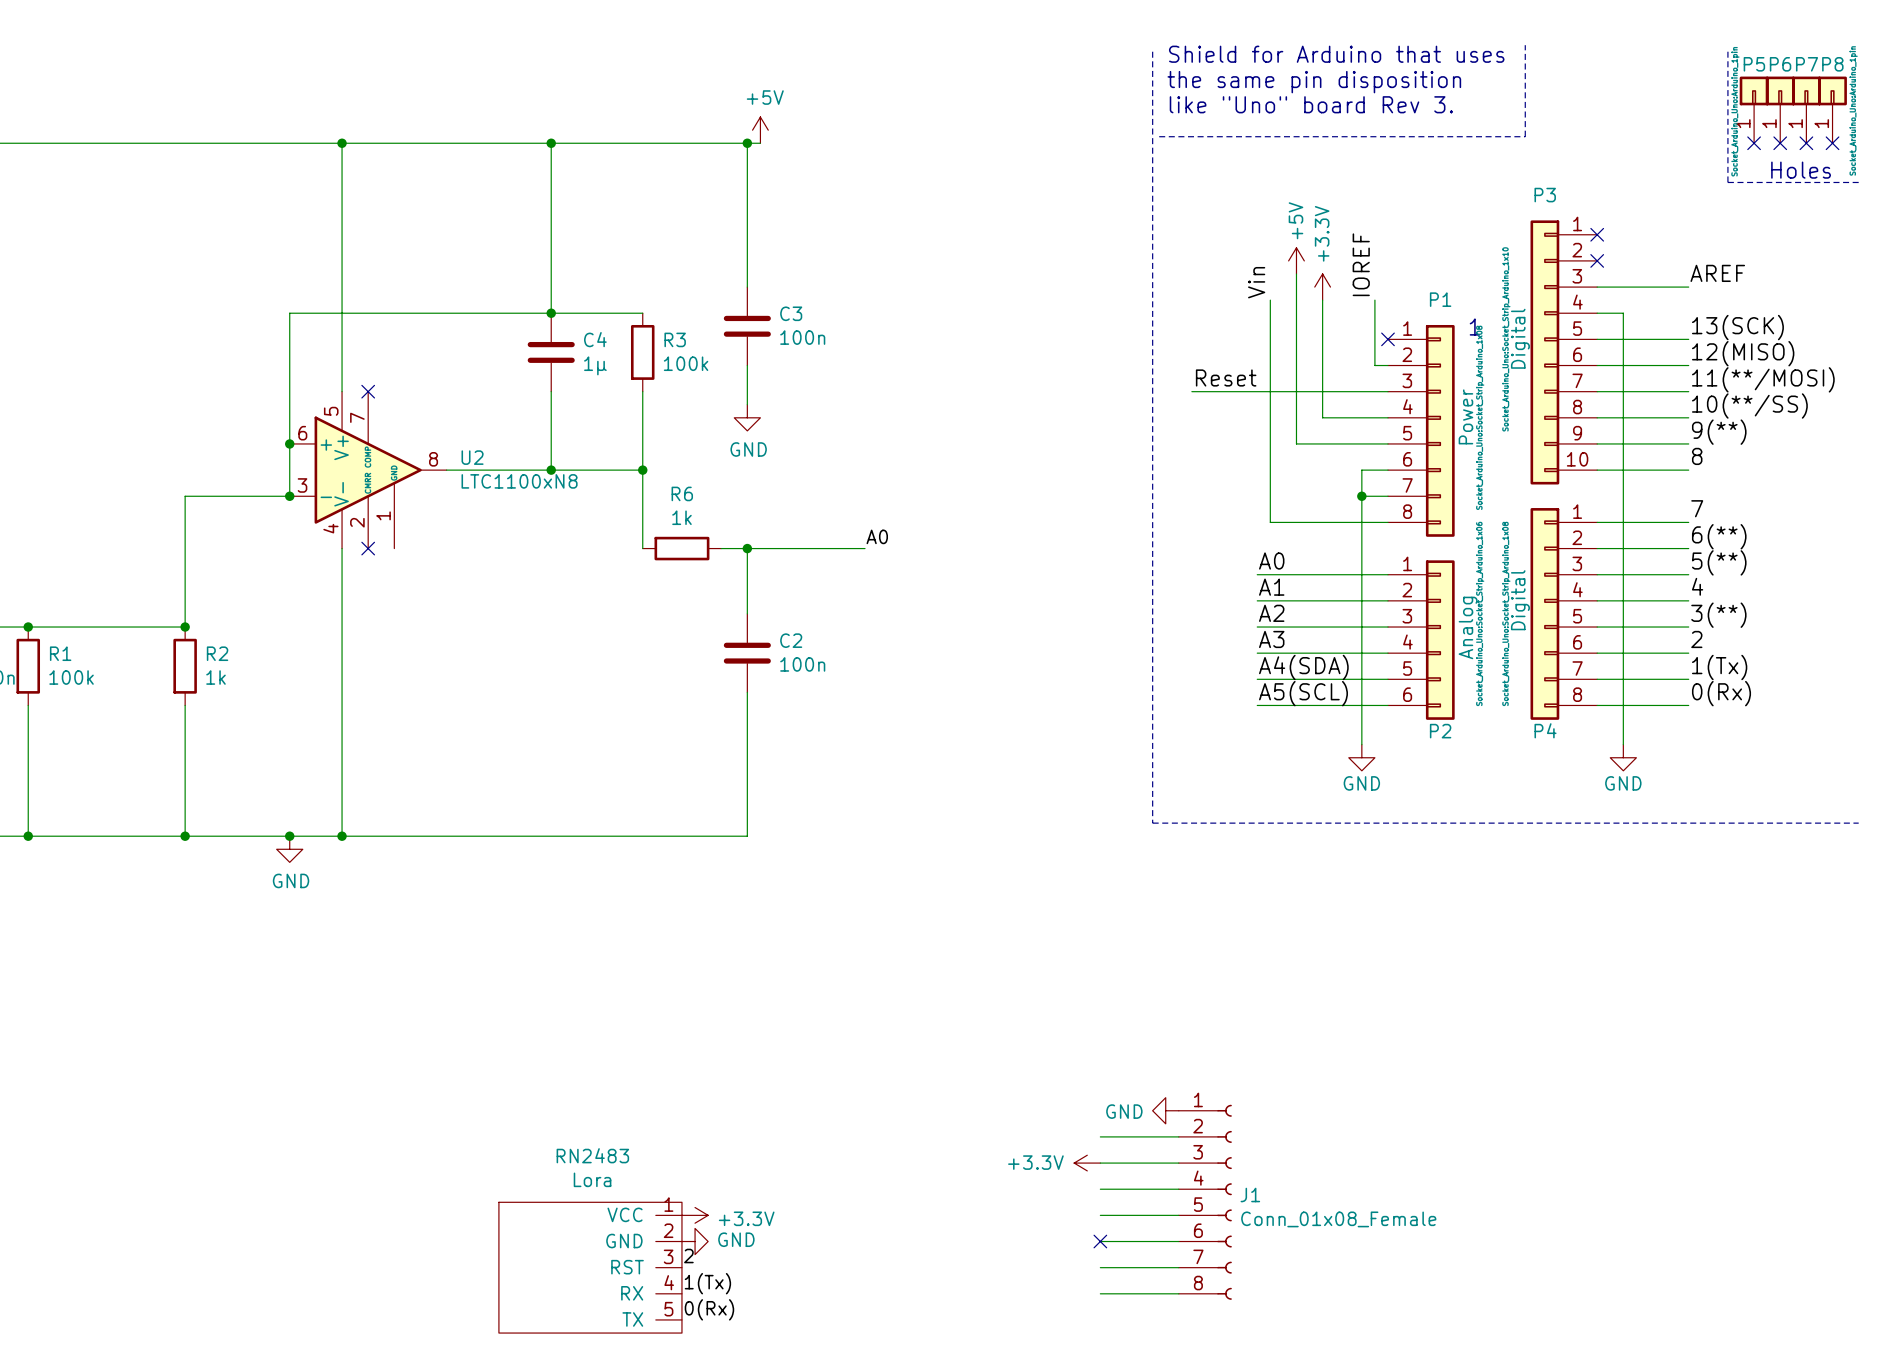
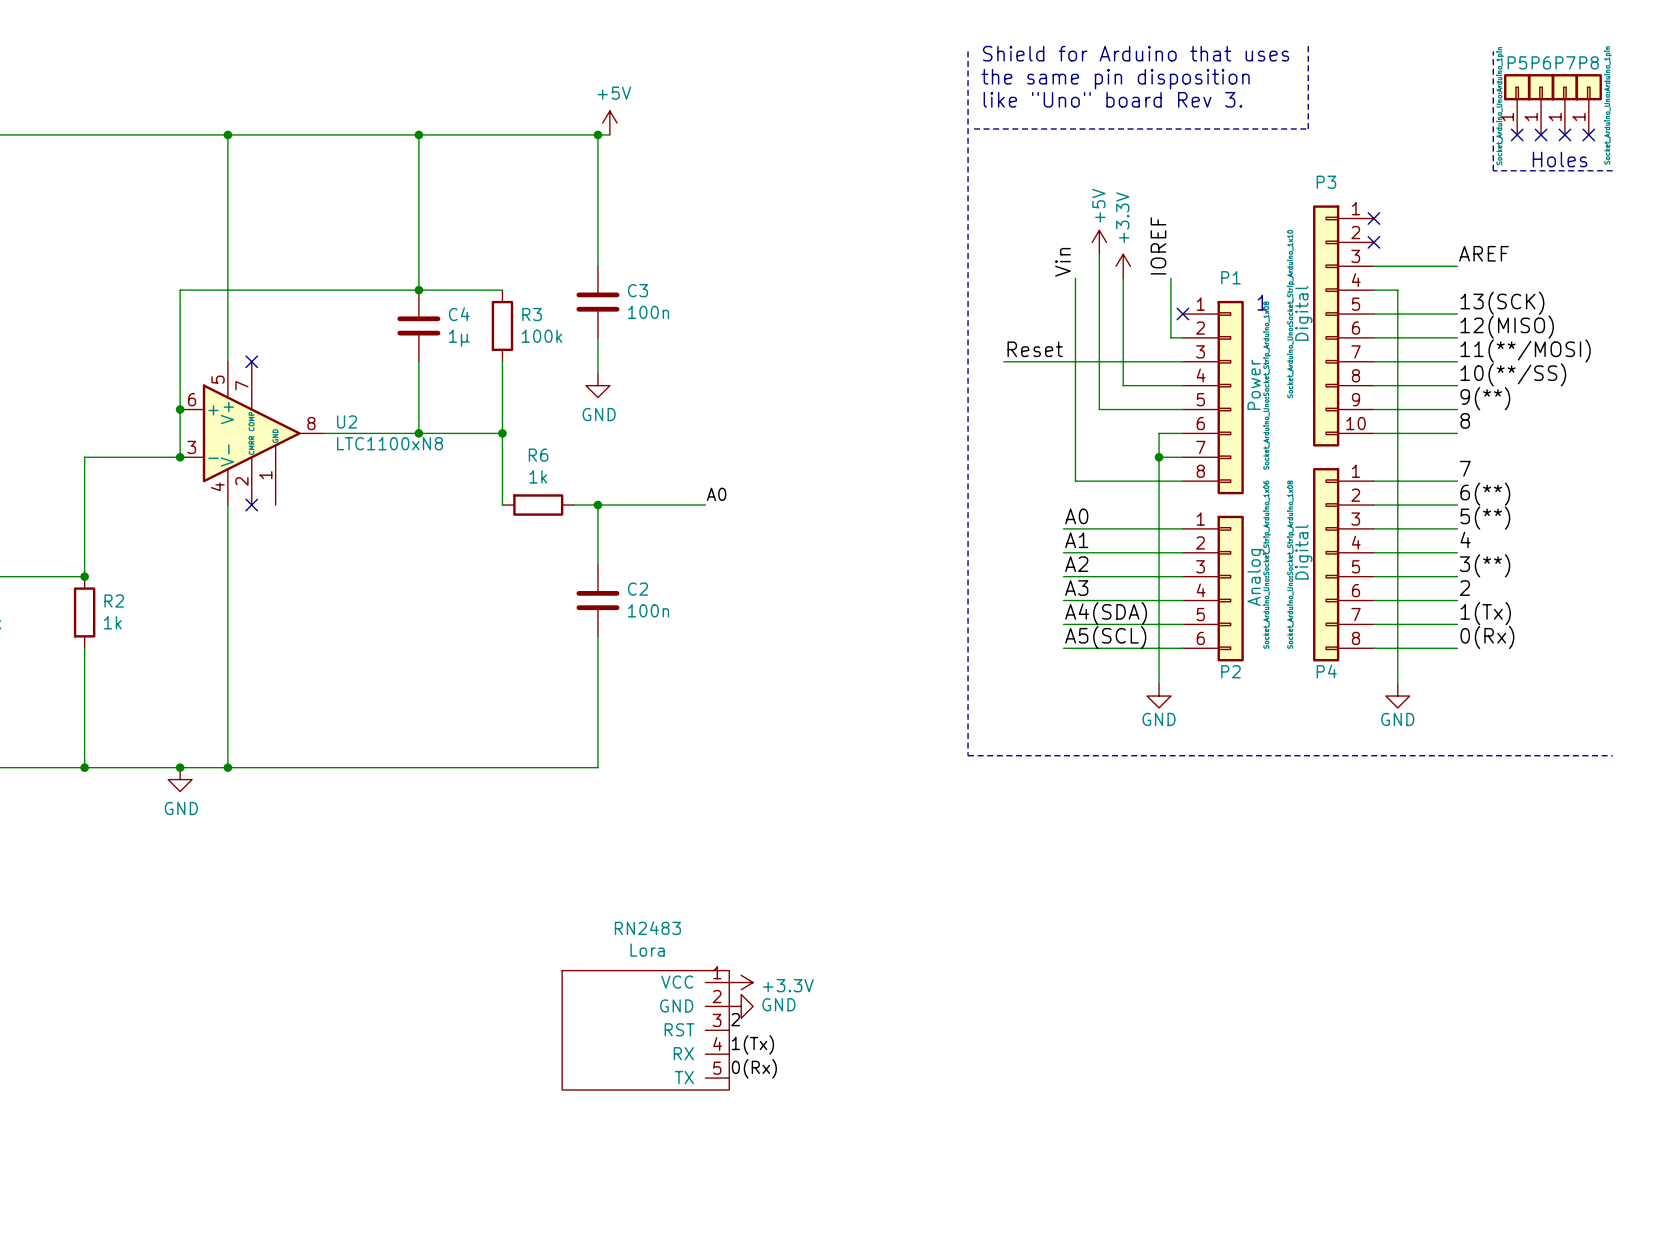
power symbol: none -> +3.3V (741, 982)
power symbol: none -> GND (741, 1006)
power symbol: GND (1165, 1110) -> none
wire: (1100, 1136) (1178, 1136) -> none
power symbol: +3.3V (1087, 1163) -> none
wire: (1100, 1163) (1178, 1163) -> none
wire: (1100, 1189) (1178, 1189) -> none
J1: Conn_01x08_Female (1205, 1202) -> none
power symbol: +3.3V (695, 1215) -> none
wire: (1100, 1215) (1178, 1215) -> none
power symbol: GND (695, 1241) -> none
wire: (1100, 1241) (1178, 1241) -> none
no-connect mark: (1100, 1241) -> none
label position: 2 (688, 1256) -> 2 (735, 1019)
RN2483 position: (590, 1267) -> (645, 1030)
wire: (1100, 1267) (1178, 1267) -> none
label position: 1(Tx) (707, 1283) -> 1(Tx) (752, 1044)
wire: (1100, 1293) (1178, 1293) -> none
label position: 0(Rx) (709, 1309) -> 0(Rx) (754, 1068)

